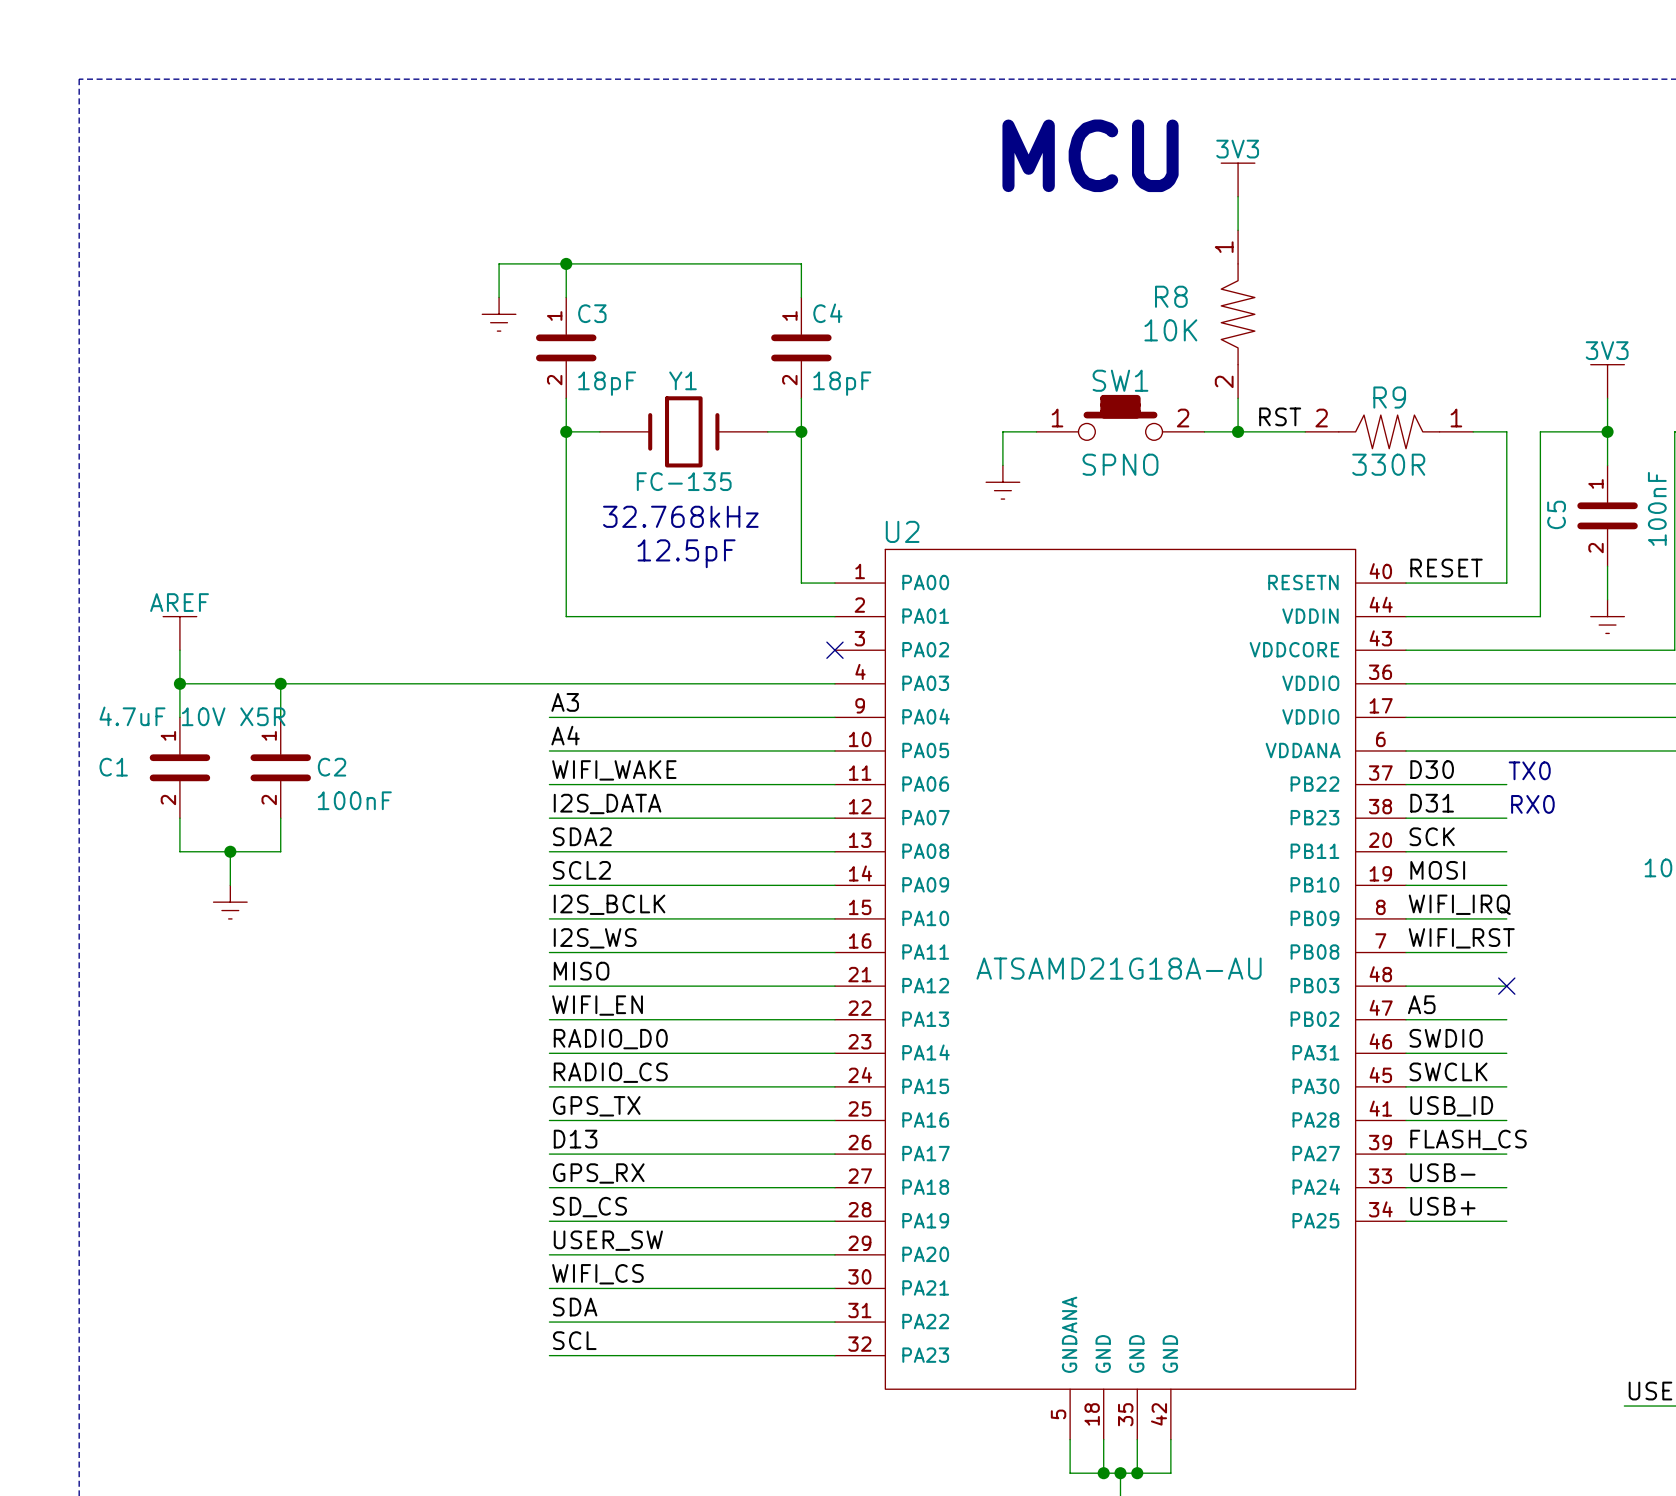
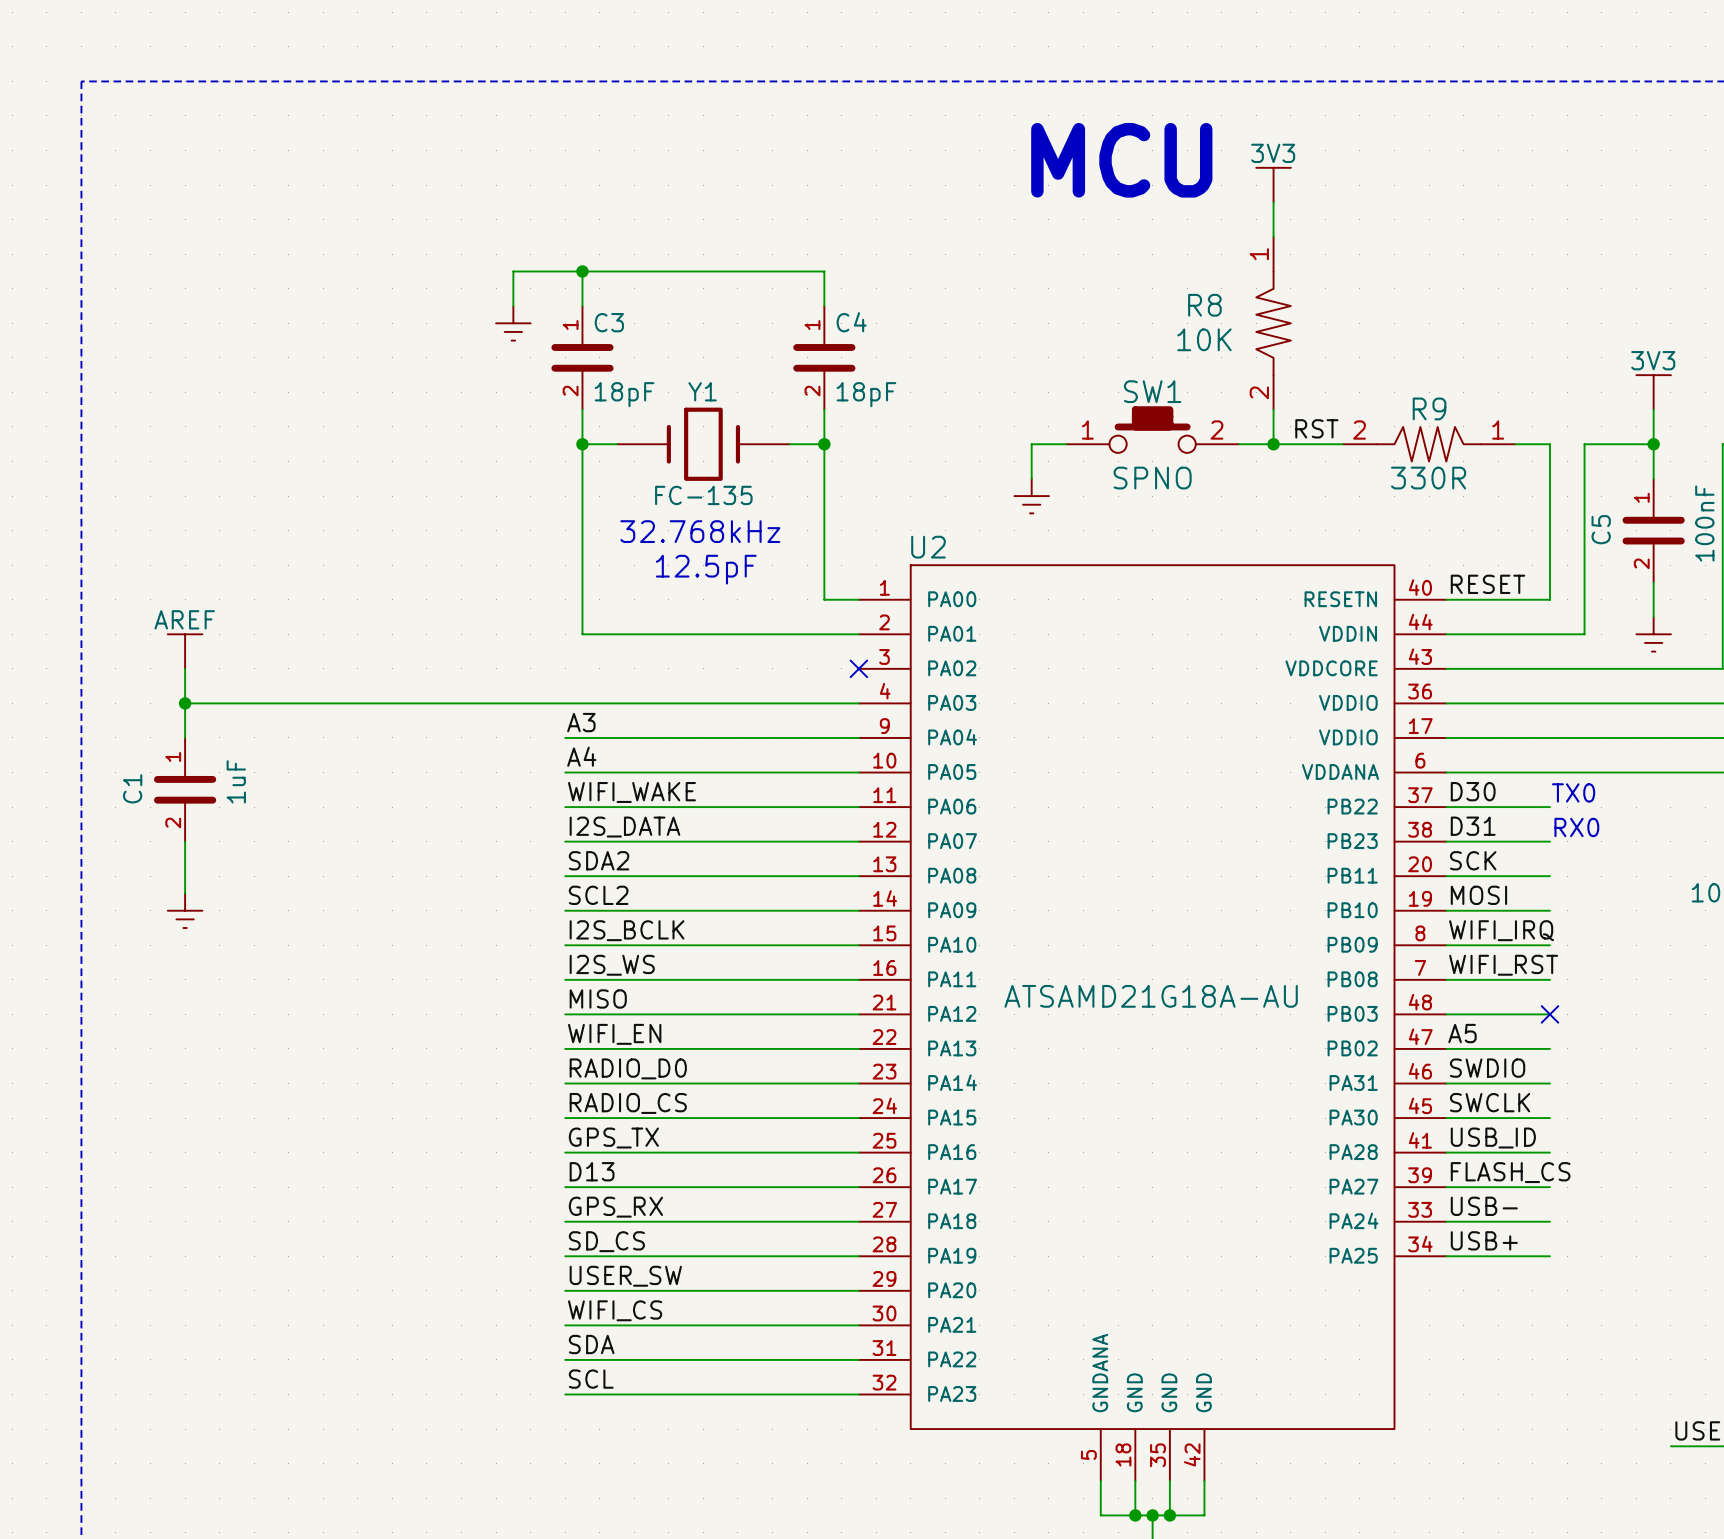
wire: (280, 683) (280, 717) -> none
junction: (280, 683) -> none
C1 value: 4.7uF 10V X5R (192, 716) -> 1uF (236, 781)
C1 name rotation: 0° (113, 767) -> 90° counterclockwise (132, 788)
C2: 100nF (280, 767) -> none
wire: (280, 818) (280, 851) (179, 851) -> (185, 893) (185, 876)
wire: (230, 851) (230, 885) -> none
junction: (230, 851) -> none
power symbol position: (230, 902) -> (185, 910)

